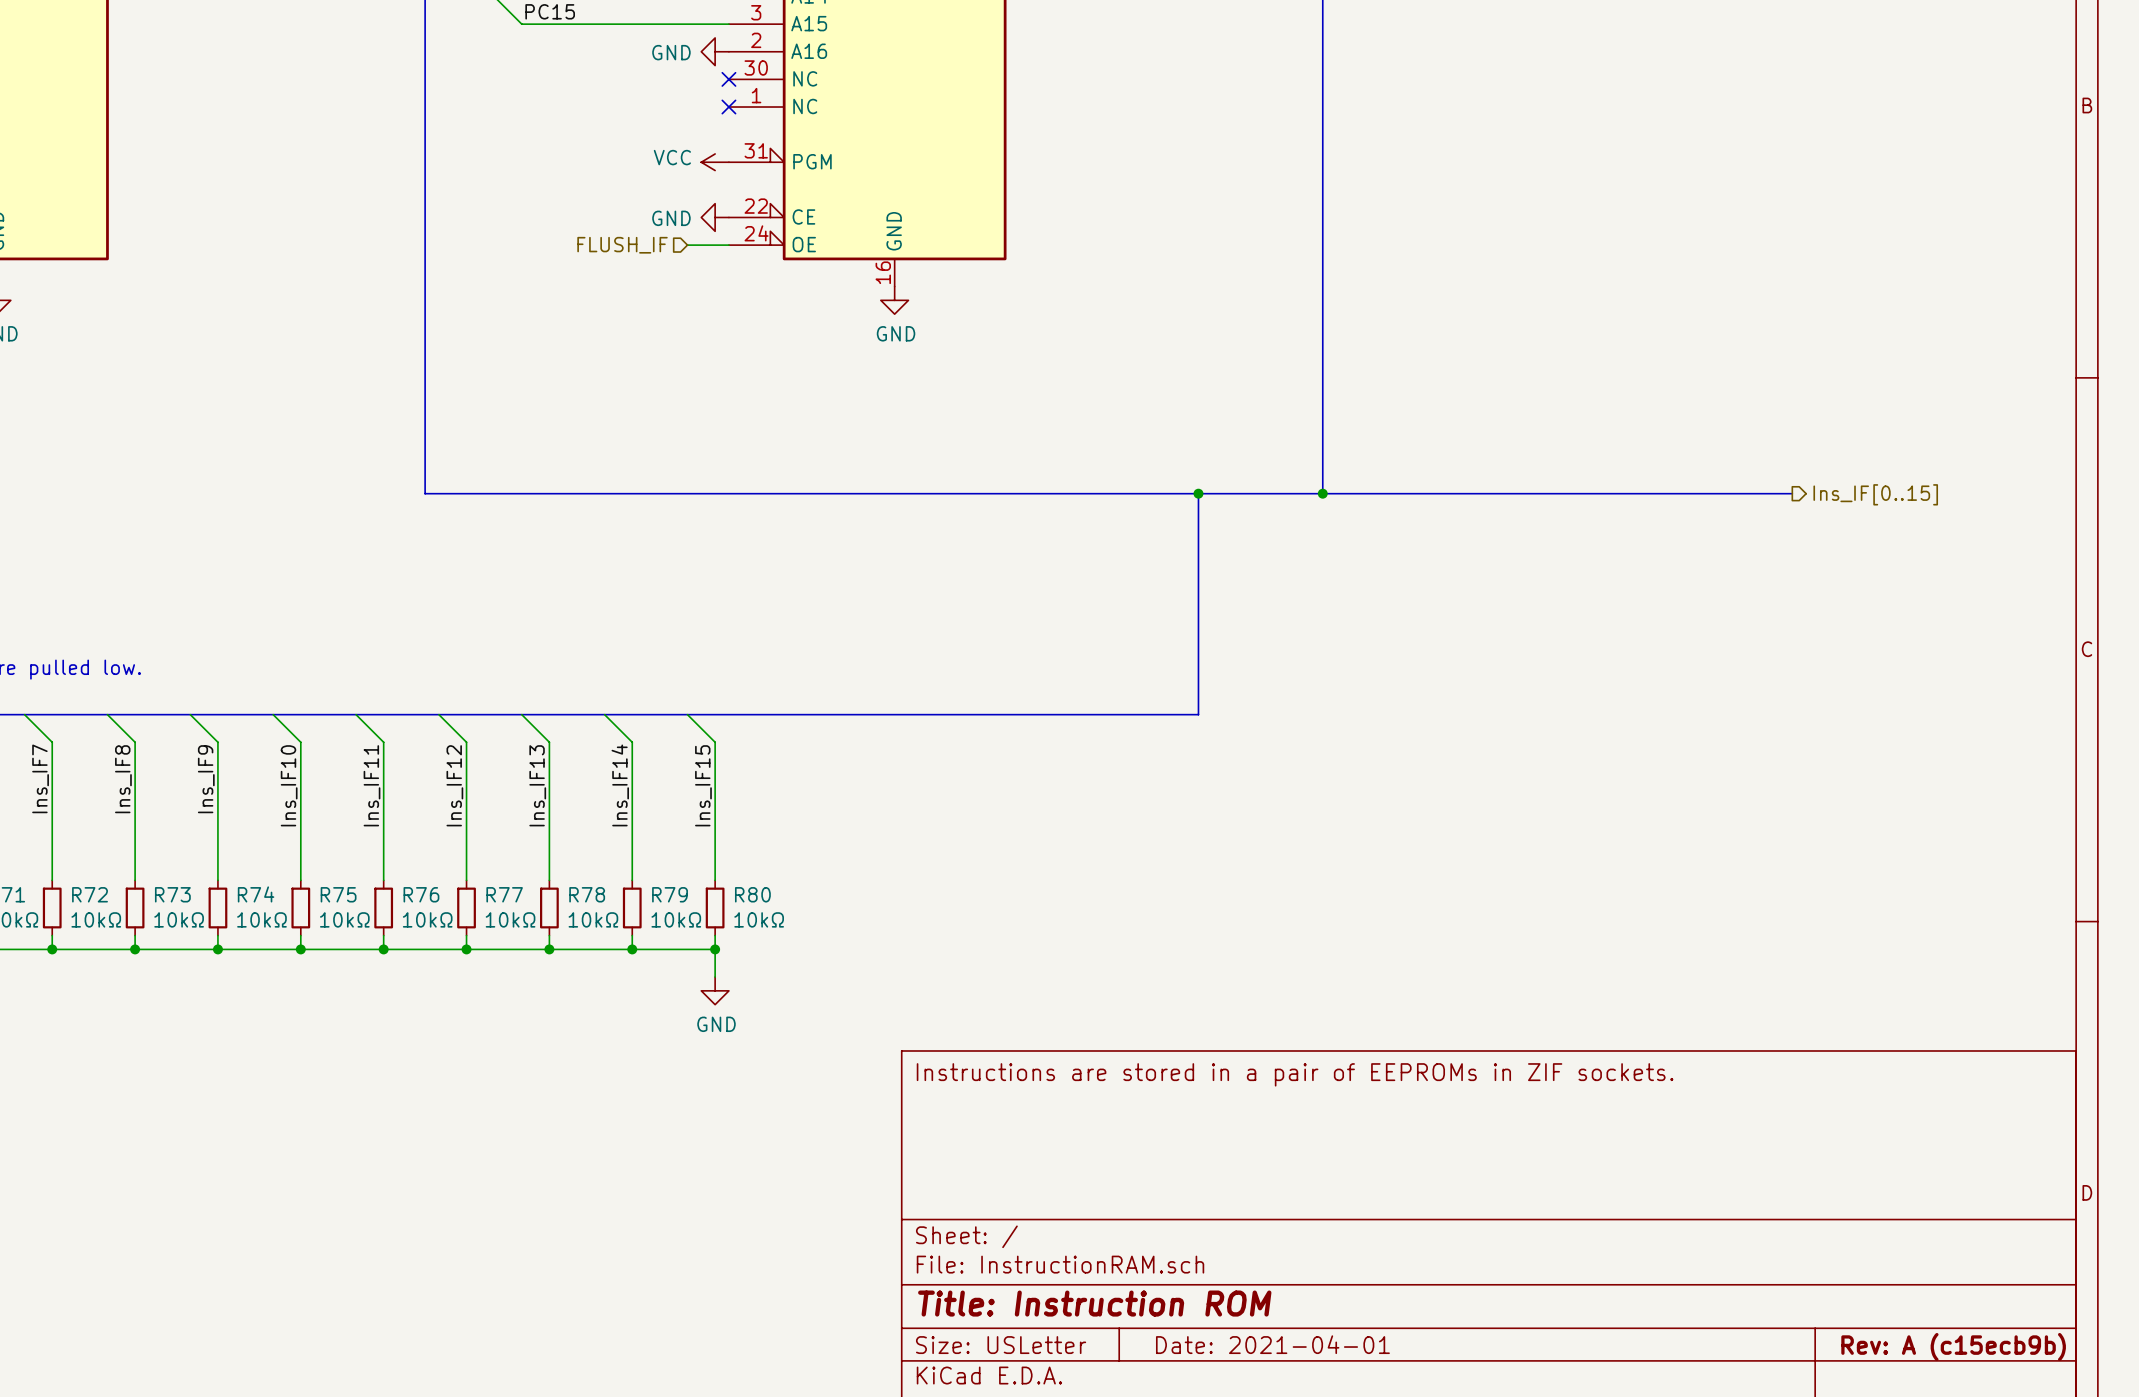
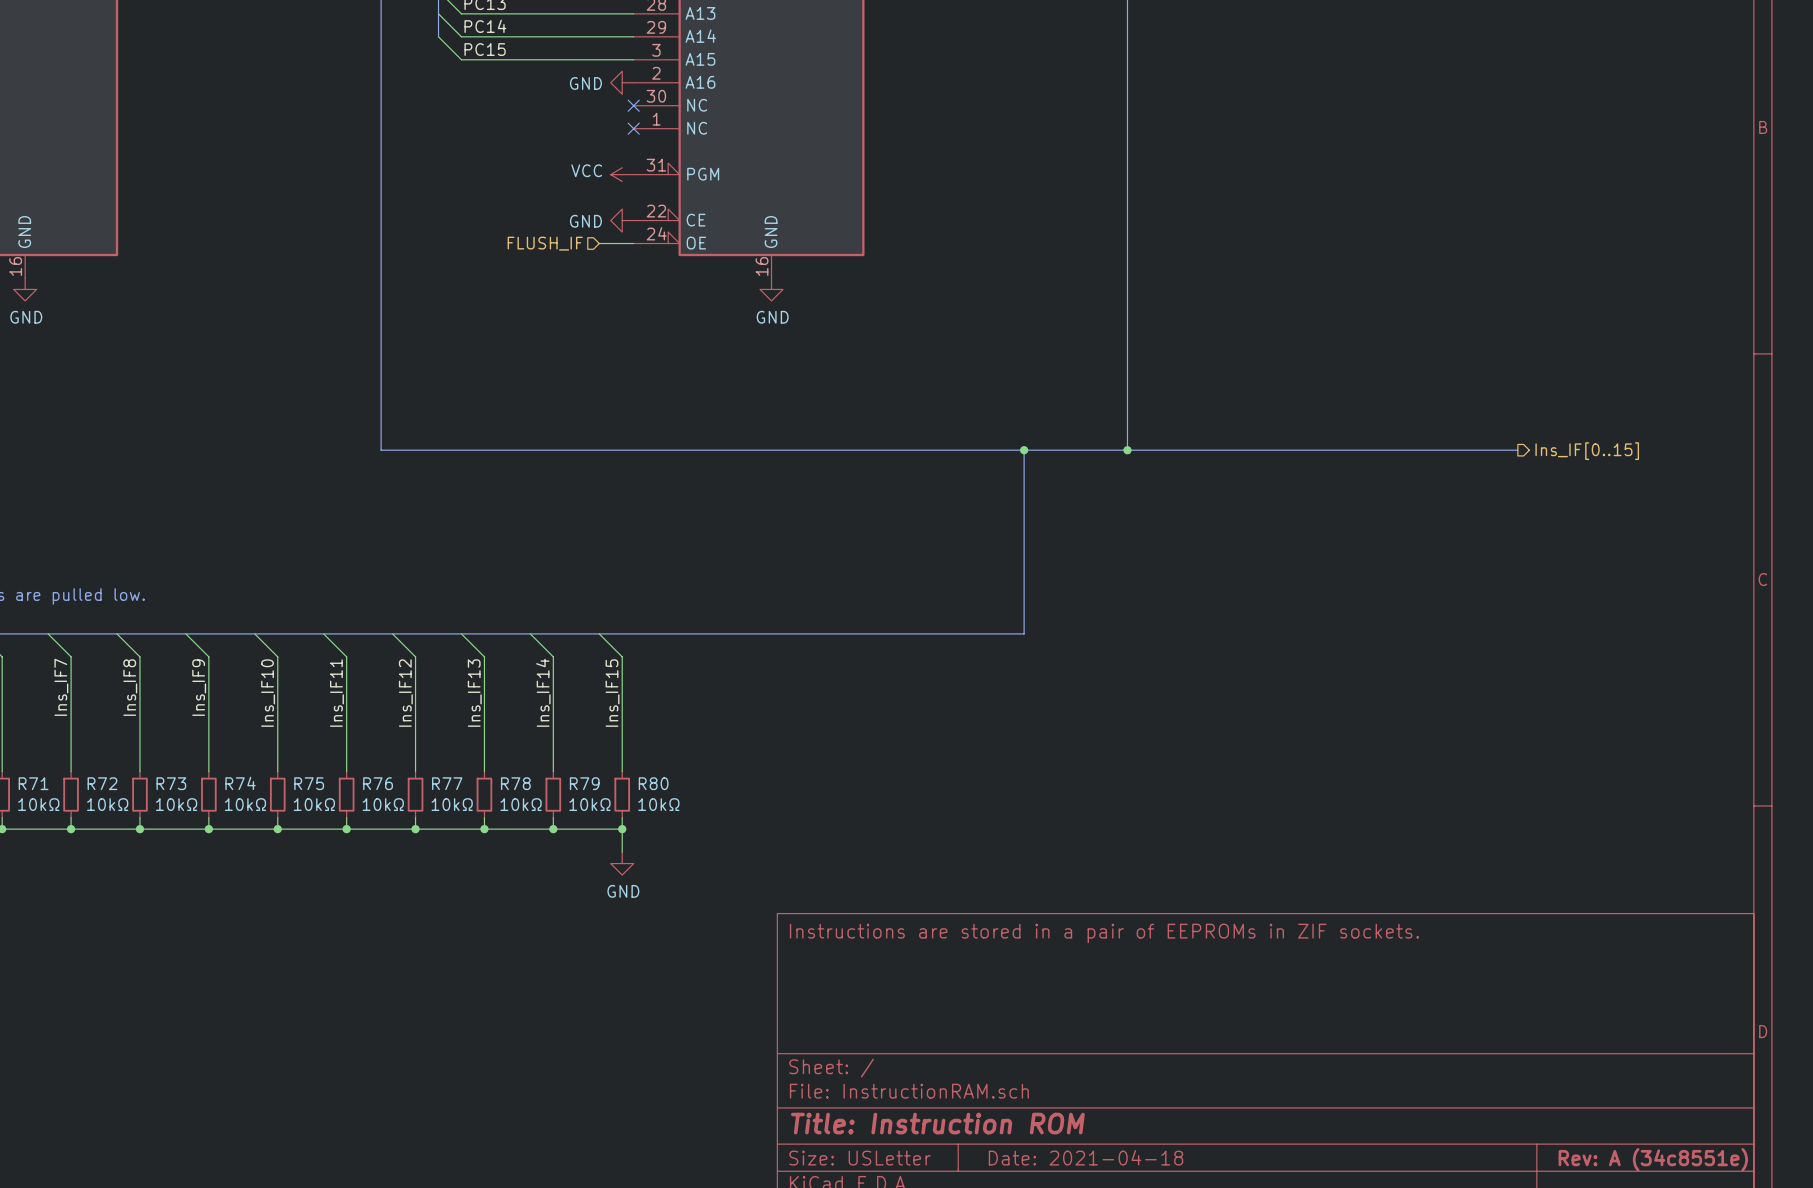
title block: Date: 2021-04-01 (1272, 1344) -> Date: 2021-04-18 (1086, 1157)
title block: Rev: A (c15ecb9b) (1953, 1347) -> Rev: A (34c8551e) (1653, 1159)

